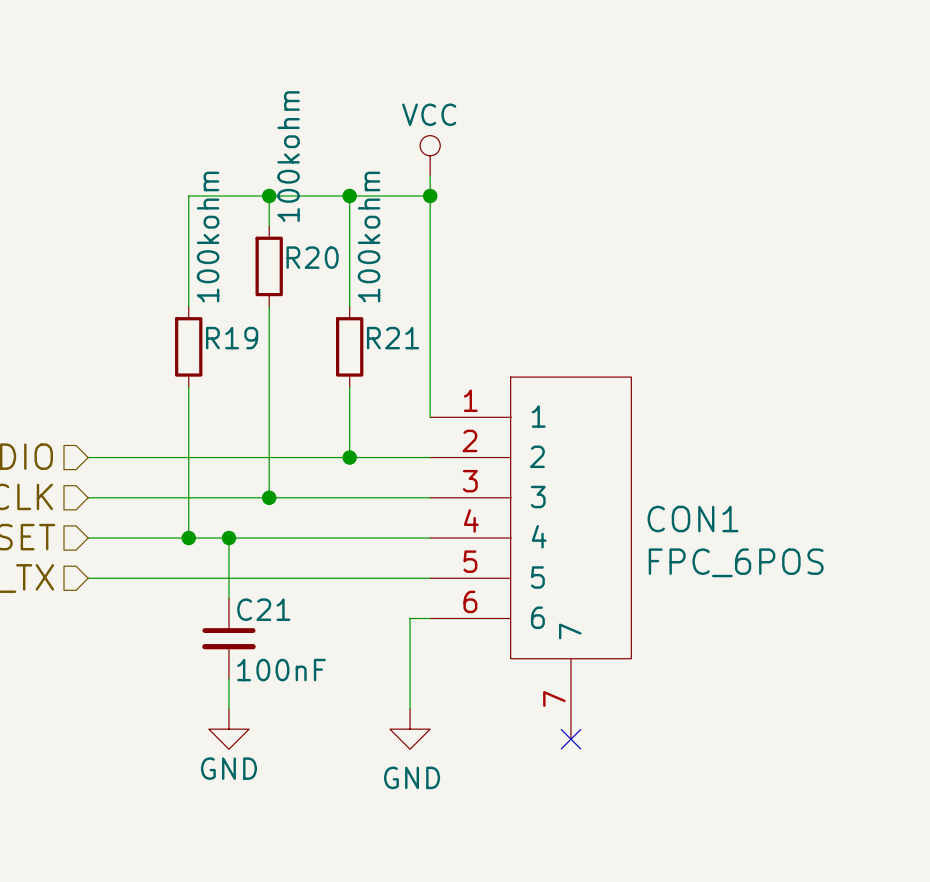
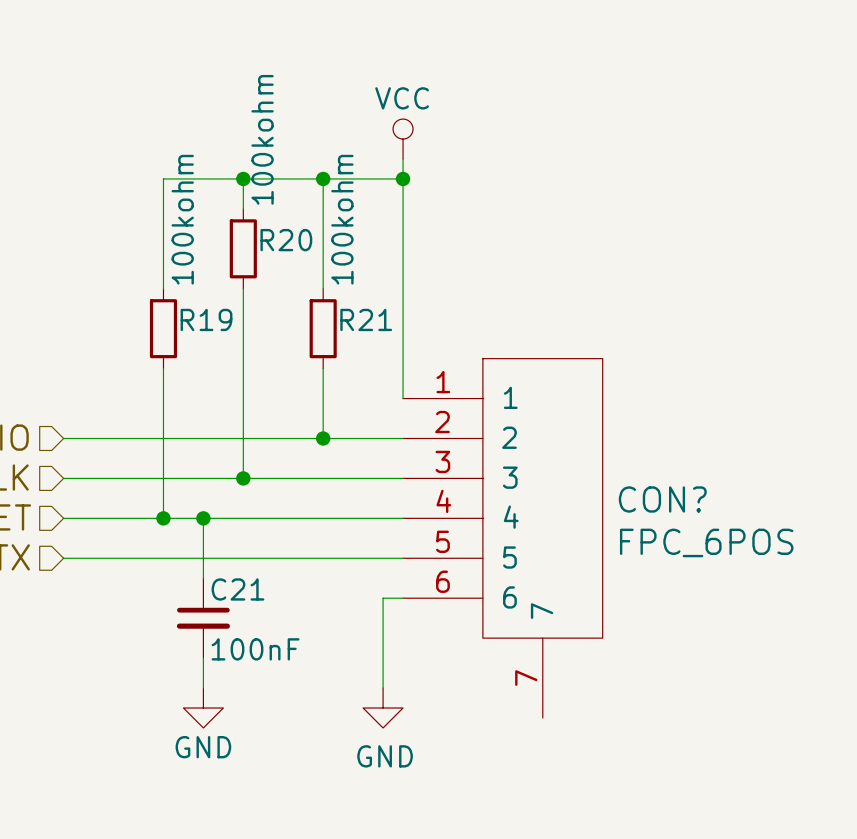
CON1 name: CON1 (693, 519) -> CON? (662, 499)
no-connect mark: (570, 739) -> none

